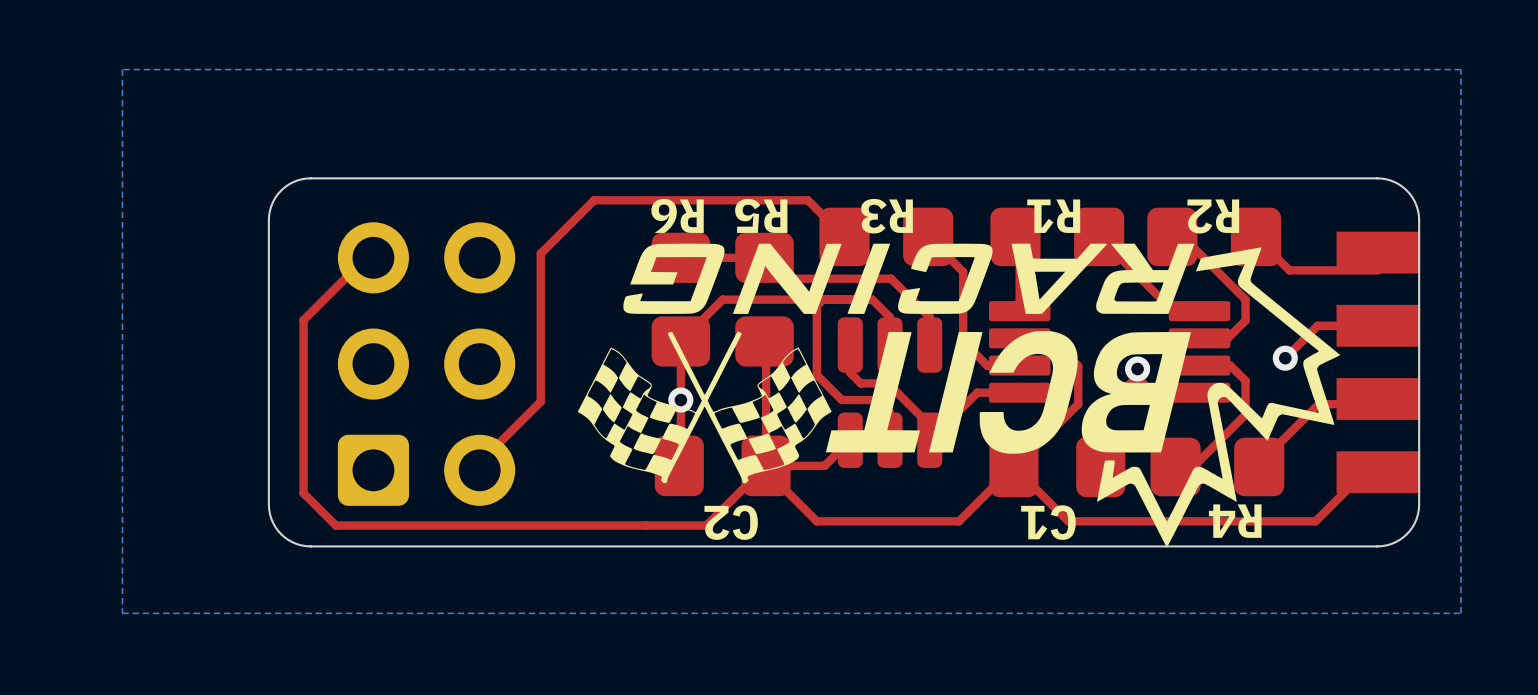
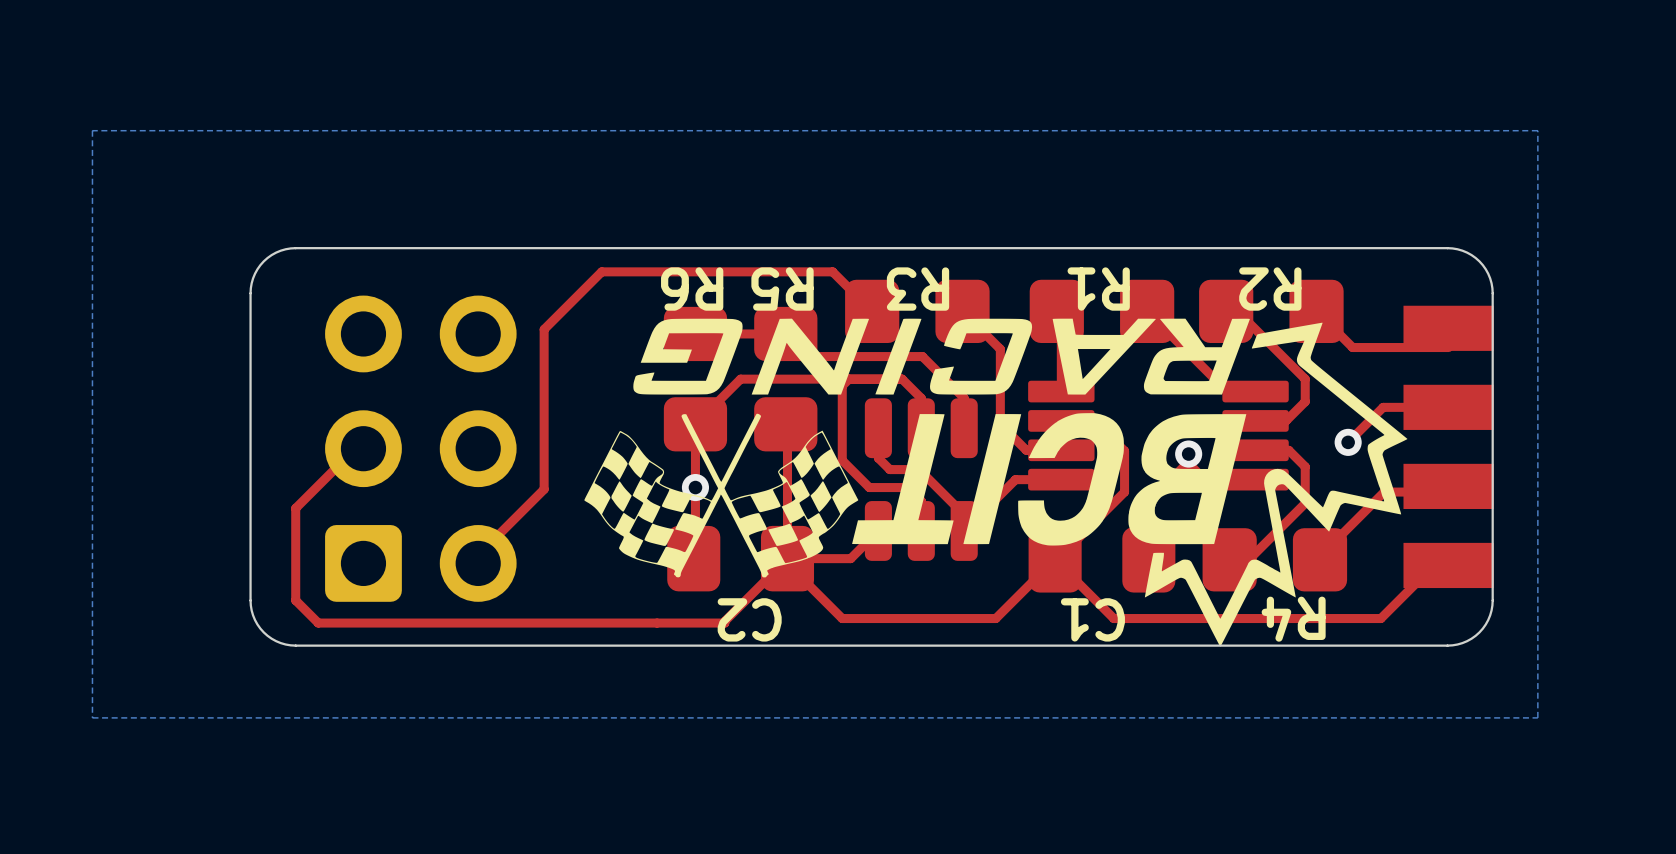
top track: (373, 250) (303, 320) (303, 493) (335, 525) -> (363, 440) (295, 508) (295, 600) (318, 623) (322, 623)

